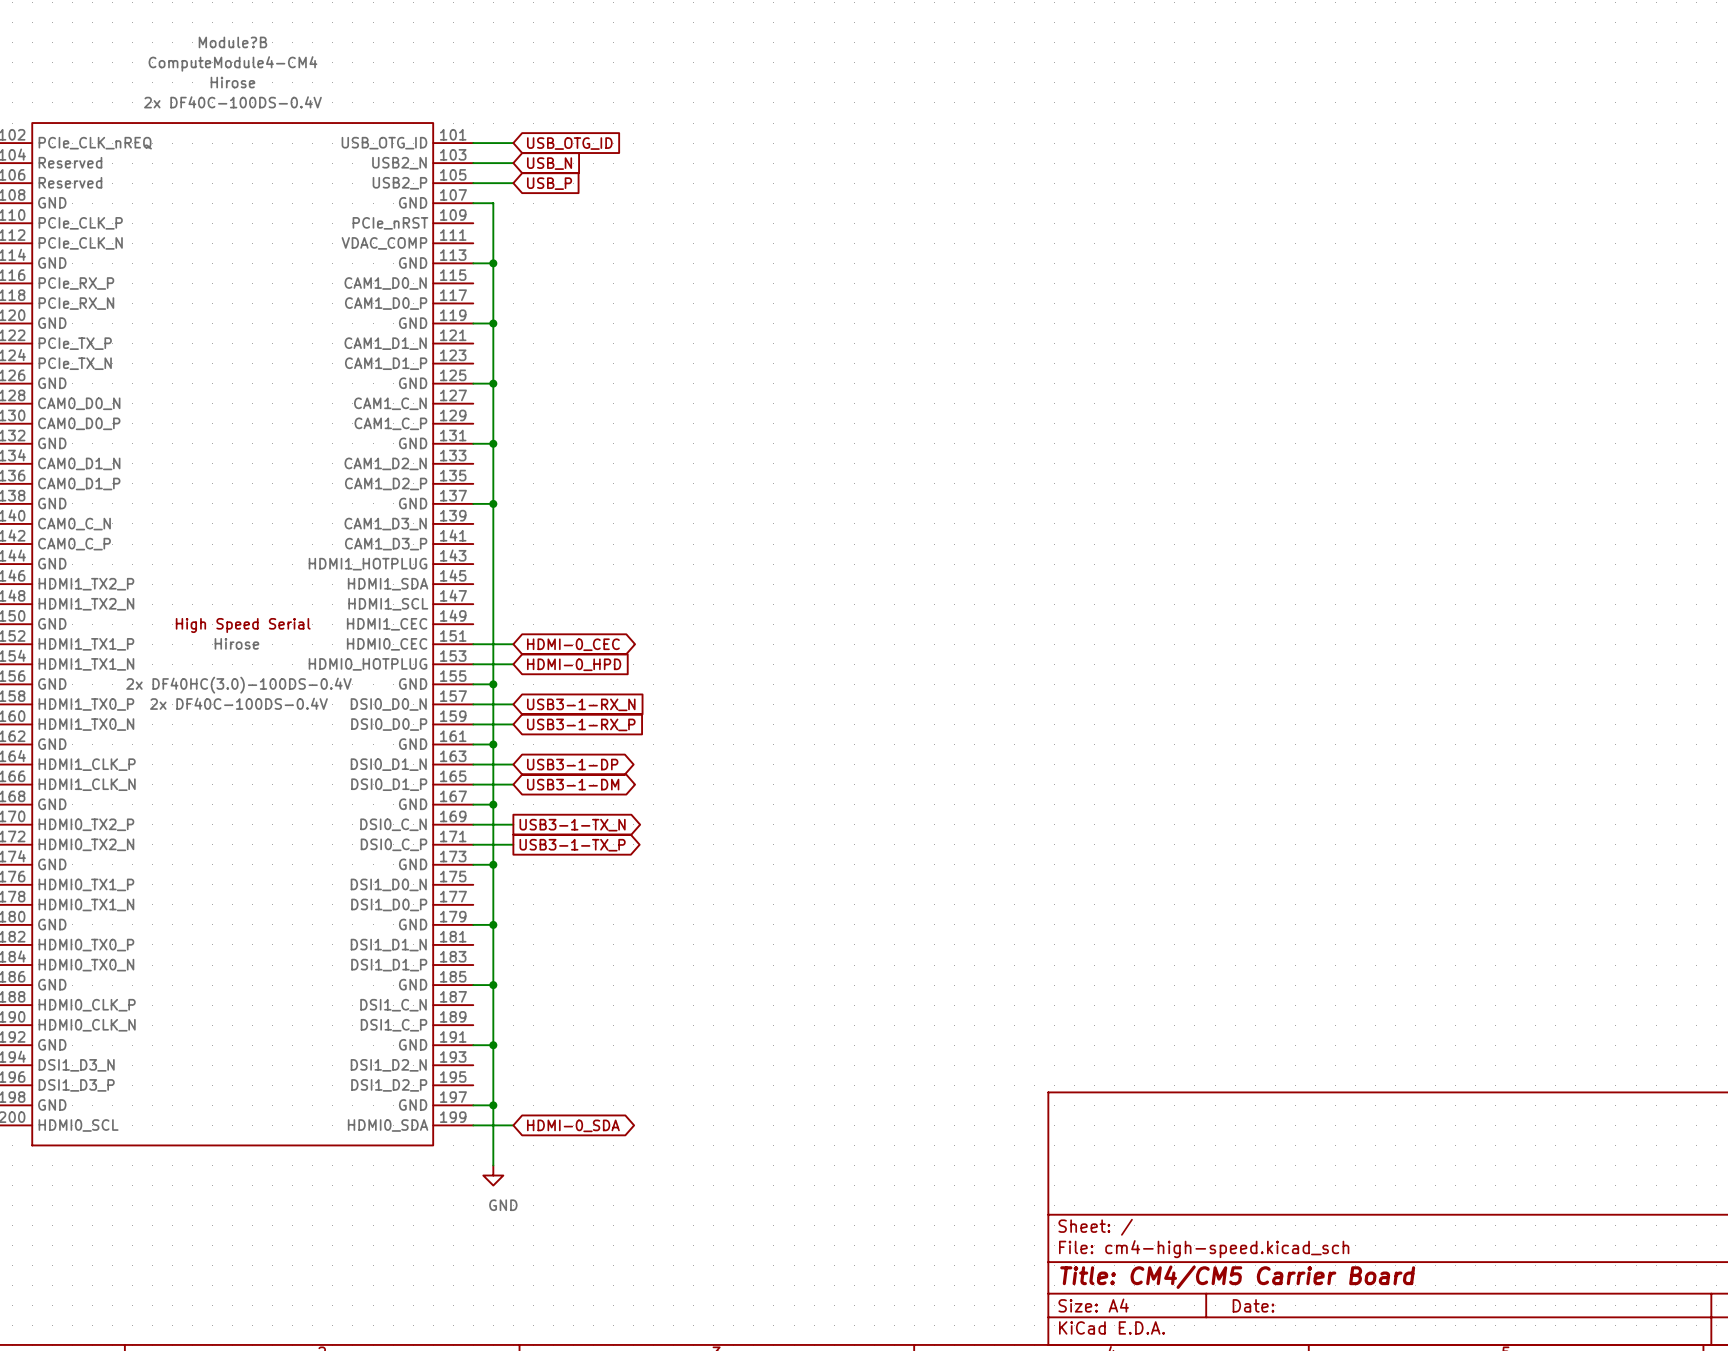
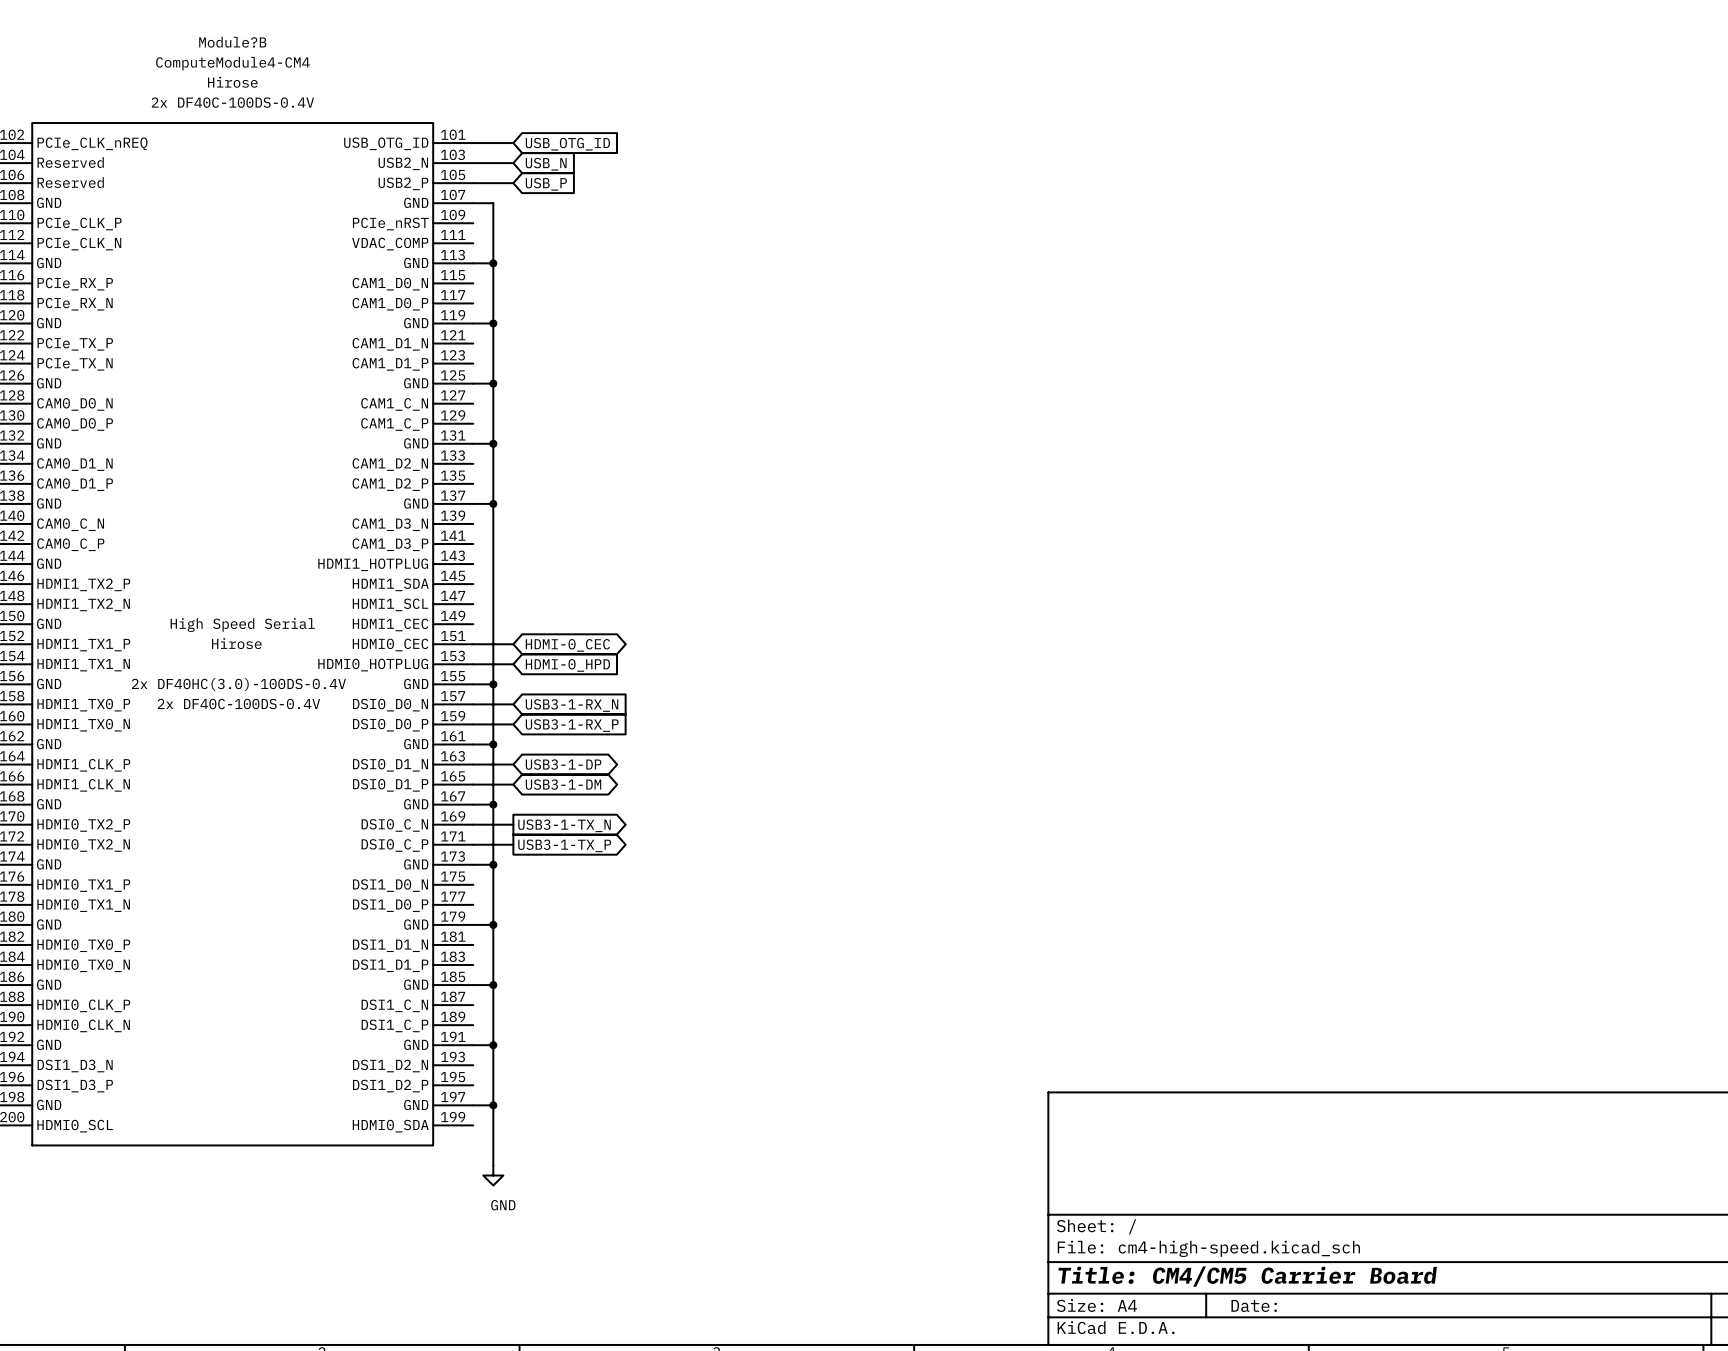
wire: (473, 1125) (513, 1125) -> none
global label: HDMI-0_SDA (573, 1125) -> none

